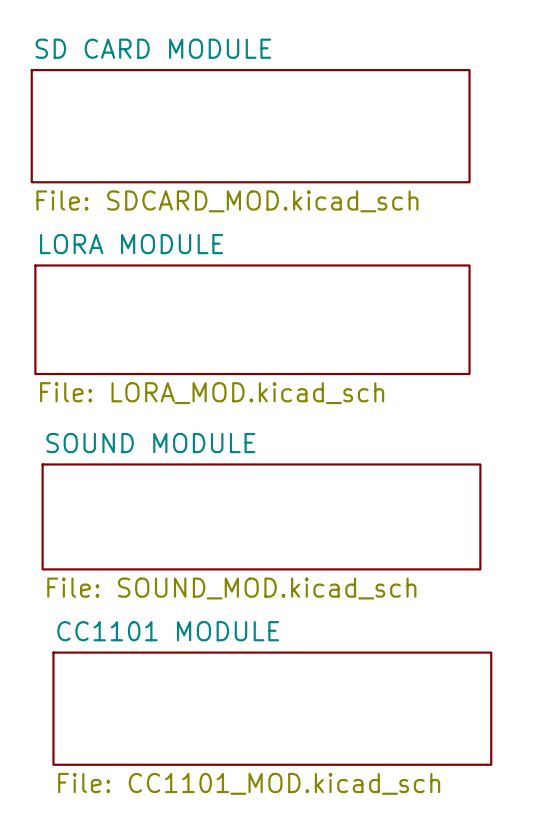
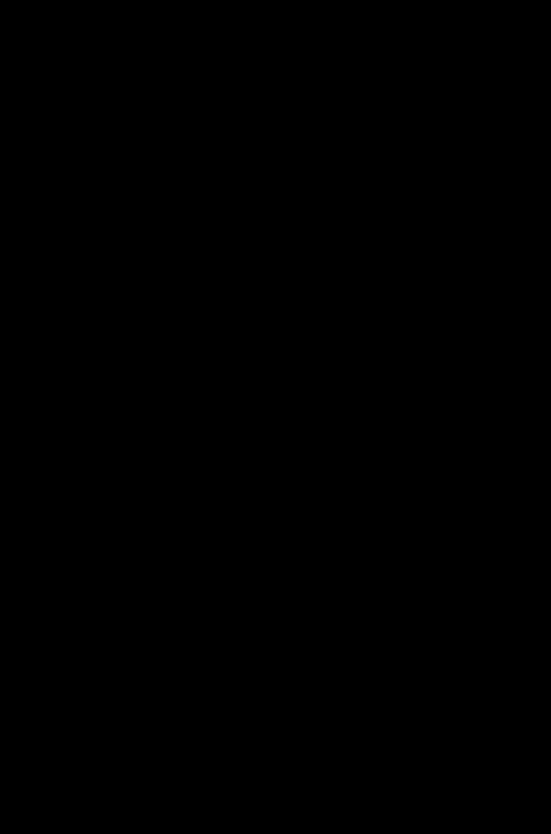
sheet SD CARD MODULE: File: SDCARD_MOD.kicad_sch (250, 126) -> none
sheet LORA MODULE: File: LORA_MOD.kicad_sch (252, 319) -> none
sheet SOUND MODULE: File: SOUND_MOD.kicad_sch (261, 516) -> none
sheet CC1101 MODULE: File: CC1101_MOD.kicad_sch (272, 708) -> none

